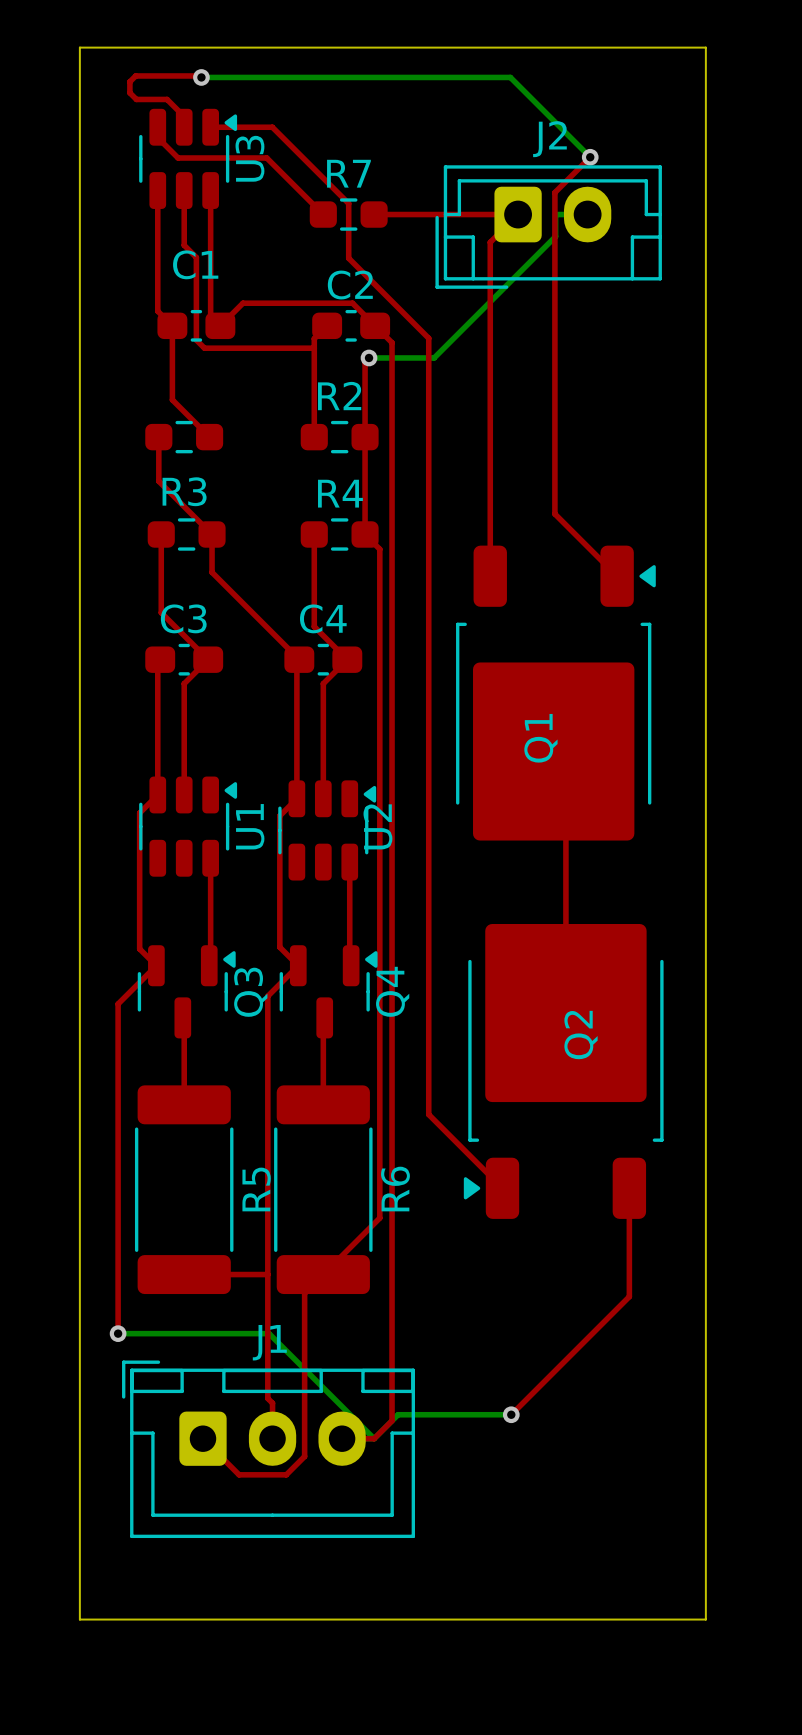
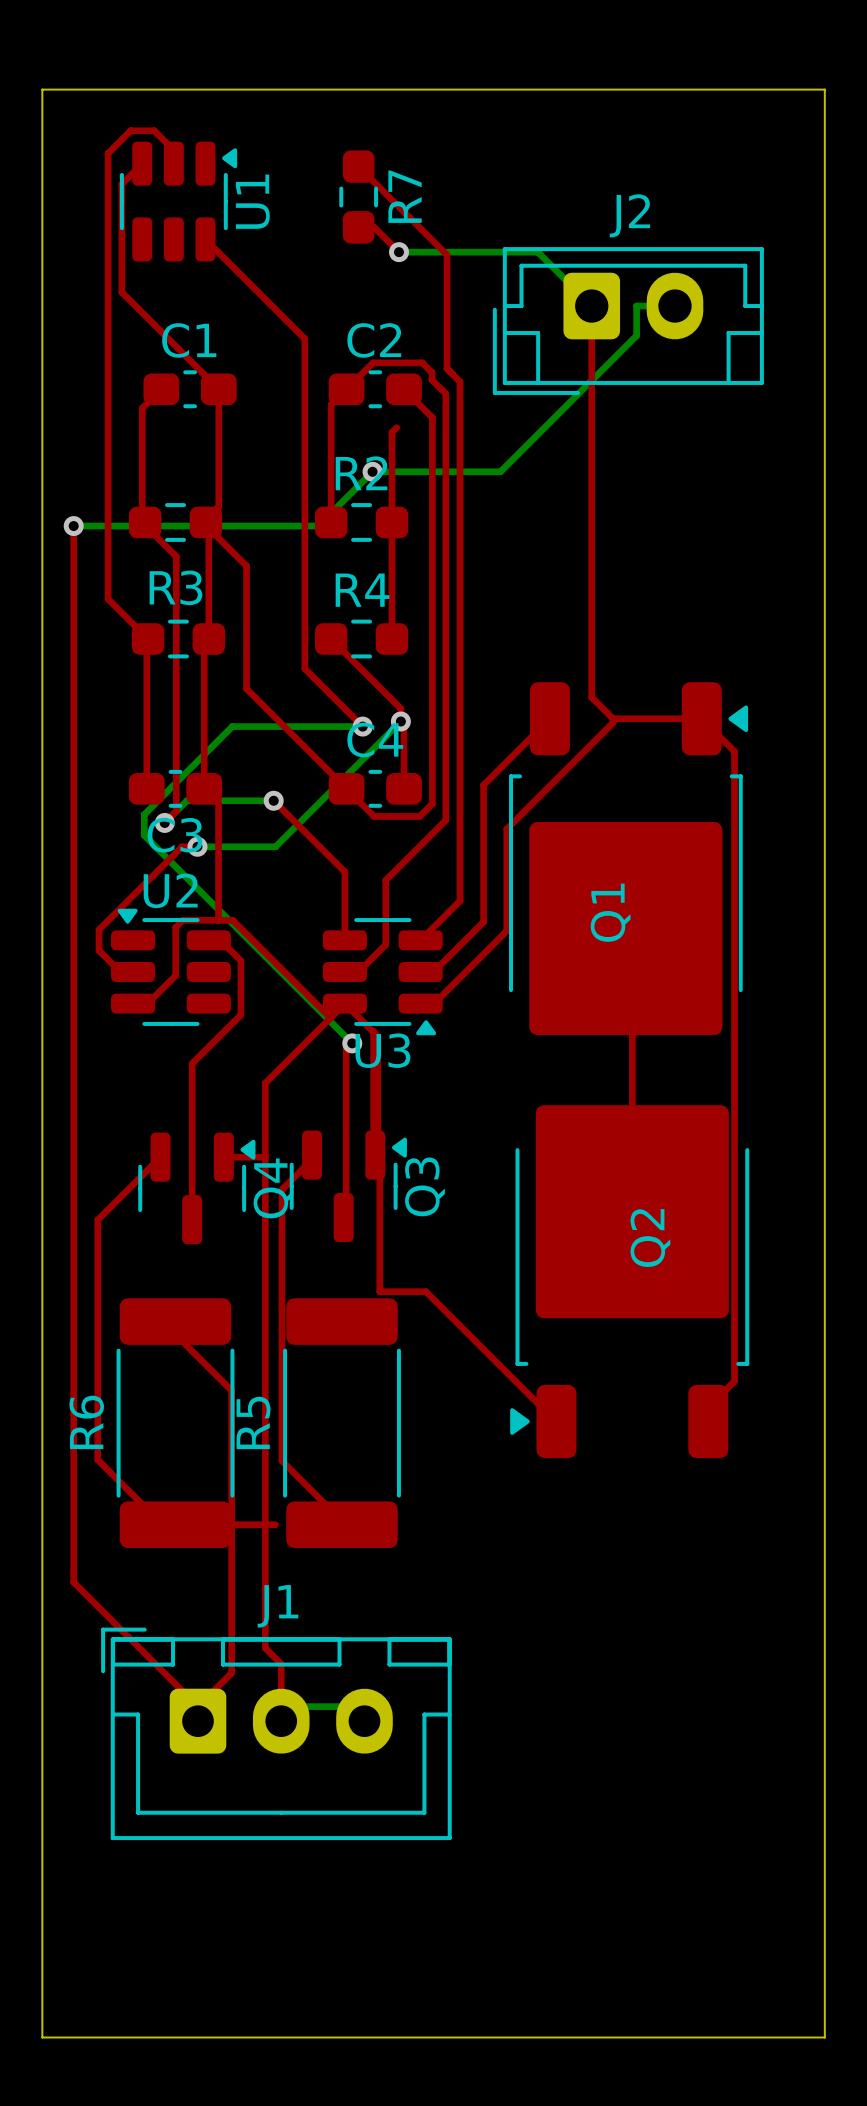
board edge: (79, 47) (705, 47) (705, 1619) (79, 1619) (79, 47) -> (42, 89) (42, 2037) (824, 2037) (824, 89) (42, 89)
top track: (201, 77) (135, 75) (129, 81) (129, 92) (136, 99) (167, 99) (184, 116) (184, 127) -> none
bottom track: (201, 77) (510, 77) (590, 157) -> none
via: (201, 77) -> none
top track: (157, 127) (157, 137) (178, 158) (266, 158) (323, 214) -> none
top track: (210, 127) (272, 127) (348, 203) (348, 258) (428, 338) (428, 1114) (502, 1188) -> none
top track: none -> (358, 166) (447, 254) (447, 368) (460, 381) (460, 901) (420, 940)
top track: (590, 157) (554, 192) (554, 514) (617, 576) -> none
via: (590, 157) -> none
U3 rotation: 0° (188, 158) -> 90° clockwise (382, 976)
U3 position: (188, 158) -> (382, 976)
top track: (157, 190) (157, 311) (172, 325) (172, 399) (209, 437) -> none
top track: (184, 190) (184, 245) (196, 257) (196, 340) (204, 348) (314, 348) -> none
top track: (210, 190) (210, 316) -> (142, 163) (121, 184) (121, 292) (207, 377)
top track: none -> (358, 227) (374, 227) (398, 252)
top track: none -> (205, 239) (304, 338) (304, 668) (362, 726)
bottom track: none -> (398, 252) (537, 252) (591, 306)
via: none -> (398, 252)
R7 rotation: 0° (348, 214) -> 90° clockwise (358, 196)
R7 position: (348, 214) -> (358, 196)
top track: (374, 214) (518, 214) (490, 242) (490, 576) -> none
bottom track: (587, 214) (555, 214) (555, 236) (434, 357) (369, 357) -> none
J2 position: (548, 227) -> (628, 321)
top track: none -> (591, 306) (591, 697) (613, 718)
bottom track: none -> (674, 306) (636, 306) (636, 335) (500, 471) (372, 471) (318, 526) (73, 526)
C1 name position: C1 (195, 264) -> C1 (189, 340)
top track: none -> (161, 389) (142, 408) (142, 522) (176, 556) (176, 811) (164, 822)
top track: (220, 325) (242, 303) (352, 303) (375, 325) -> (218, 389) (218, 506) (202, 522) (246, 565) (246, 688) (374, 816) (419, 816) (432, 803) (432, 417) (424, 409)
top track: none -> (346, 389) (372, 362) (422, 362) (432, 372) (432, 379) (445, 393) (445, 820) (385, 880) (385, 944) (358, 971) (344, 971)
top track: (392, 342) (392, 1420) (374, 1438) (342, 1438) -> none
via position: (369, 357) -> (372, 471)
top track: (158, 437) (158, 481) (212, 534) (212, 572) (299, 659) (296, 662) (296, 798) (279, 815) (279, 947) (298, 965) (267, 996) (267, 1398) (272, 1403) -> (549, 1414) (425, 1291) (379, 1291) (377, 1036) (344, 1003) (265, 1083) (265, 1648) (281, 1664) (281, 1678)
top track: none -> (73, 526) (73, 1582) (198, 1706) (231, 1672) (231, 1390) (164, 1323)
via: none -> (73, 526)
top track: none -> (208, 528) (208, 639) (204, 643) (204, 788) (218, 803) (218, 920)
top track: (161, 534) (161, 612) (208, 659) (184, 683) (184, 794) -> none
top track: (314, 534) (314, 626) (347, 659) (323, 683) (323, 798) -> (331, 639) (400, 708) (400, 721) (404, 724) (404, 788)
top track: (365, 534) (379, 549) (379, 1218) (304, 1293) (304, 1456) (286, 1474) (239, 1474) (202, 1438) -> none
top track: none -> (549, 718) (483, 785) (483, 921) (433, 971) (420, 971)
top track: none -> (613, 718) (701, 718) (734, 751) (734, 1381) (700, 1414)
top track: none -> (613, 718) (613, 722) (506, 829) (506, 930) (434, 1003) (420, 1003)
bottom track: none -> (400, 721) (275, 846) (197, 846)
via: none -> (400, 721)
bottom track: none -> (362, 726) (232, 726) (144, 814) (144, 835) (352, 1043)
via: none -> (362, 726)
C3 name position: C3 (183, 618) -> C3 (174, 835)
top track: (160, 659) (157, 662) (157, 794) (139, 813) (139, 949) (156, 965) (118, 1004) (118, 1333) -> (146, 788) (148, 639) (108, 599) (108, 153) (130, 130) (154, 130) (173, 150) (173, 163)
C4 position: (323, 659) -> (375, 788)
top track: none -> (273, 800) (344, 871) (344, 940)
bottom track: none -> (273, 800) (186, 800) (164, 822)
via: none -> (273, 800)
via: none -> (164, 822)
Q1 position: (555, 693) -> (628, 858)
top track: none -> (197, 846) (182, 846) (99, 929) (99, 950) (120, 971) (133, 971)
via: none -> (197, 846)
top track: none -> (208, 940) (220, 940) (240, 960) (240, 1014) (192, 1063) (192, 1219)
U1 position: (188, 826) -> (178, 201)
U2 rotation: 0° (327, 830) -> 90° counterclockwise (170, 967)
U2 position: (327, 830) -> (170, 967)
top track: none -> (133, 1003) (147, 1003) (175, 975) (175, 927) (182, 920) (232, 920) (330, 1018)
top track: (210, 858) (209, 965) -> none
top track: none -> (352, 1043) (346, 1049) (346, 1219)
via: none -> (352, 1043)
top track: none -> (160, 1157) (97, 1219) (97, 1459) (164, 1526)
top track: none -> (223, 1157) (265, 1157)
top track: none -> (314, 1157) (281, 1189) (281, 1460) (347, 1526)
Q3 position: (186, 991) -> (196, 1188)
Q4 name: Q4 (392, 991) -> Q3 (424, 1186)
Q3 name: Q3 (250, 992) -> Q4 (273, 1188)
top track: (182, 1017) (184, 1104) -> none
top track: (324, 1017) (323, 1104) -> none
top track: (629, 1188) (629, 1296) (511, 1414) -> none
R5 name: R5 (256, 1189) -> R6 (86, 1422)
R6 name: R6 (395, 1189) -> R5 (253, 1422)
bottom track: (118, 1333) (269, 1333) (374, 1438) -> none
via: (118, 1333) -> none
bottom track: (511, 1414) (398, 1414) (374, 1438) -> none
via: (511, 1414) -> none
bottom track: none -> (281, 1706) (364, 1706)

